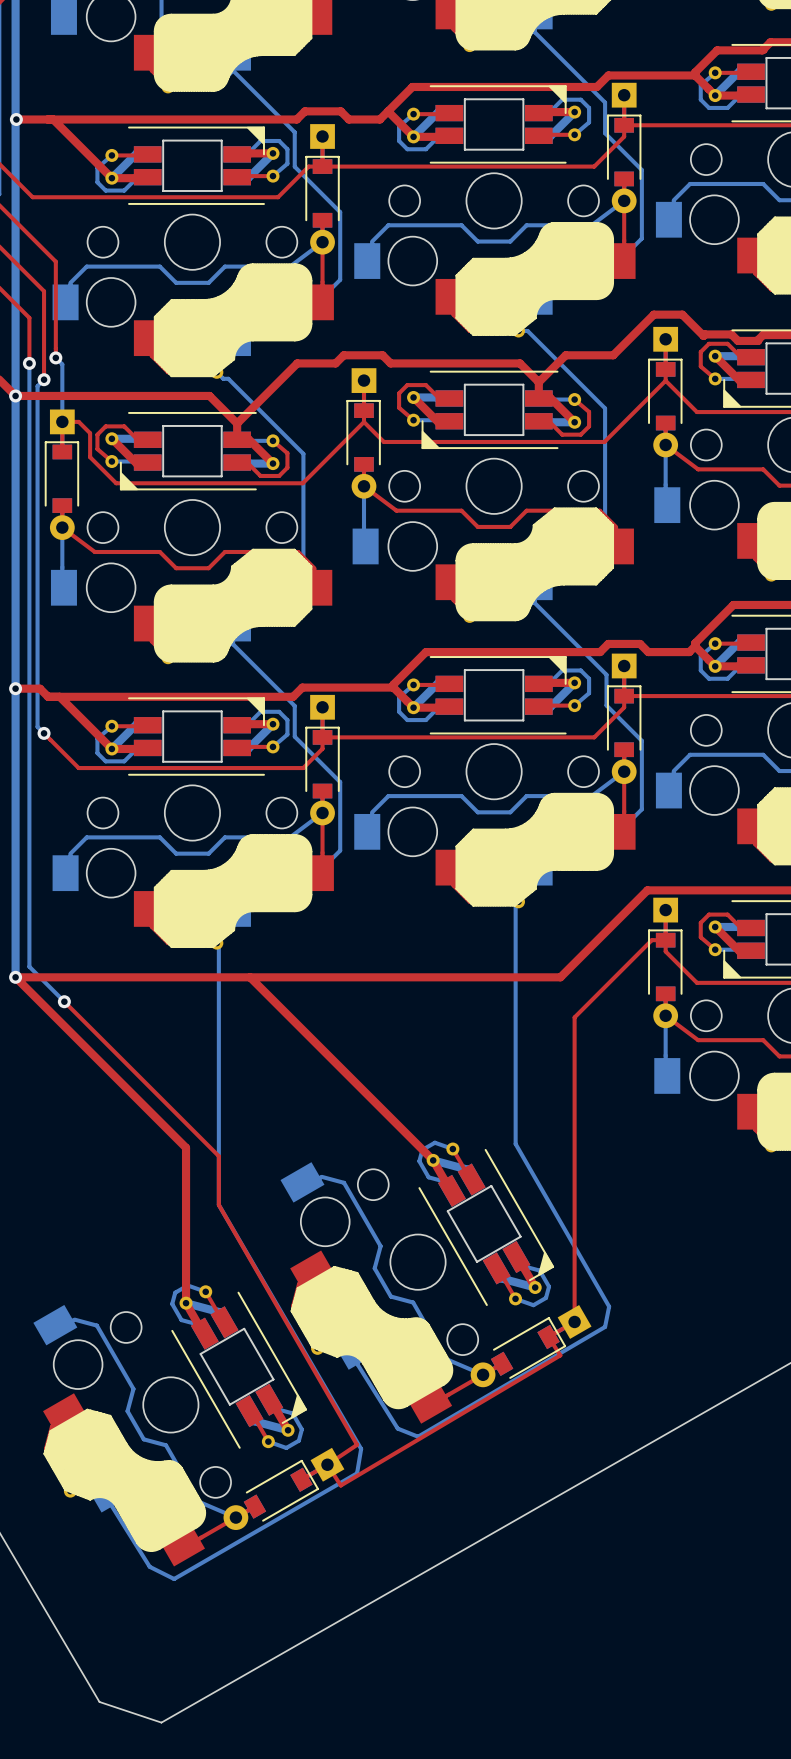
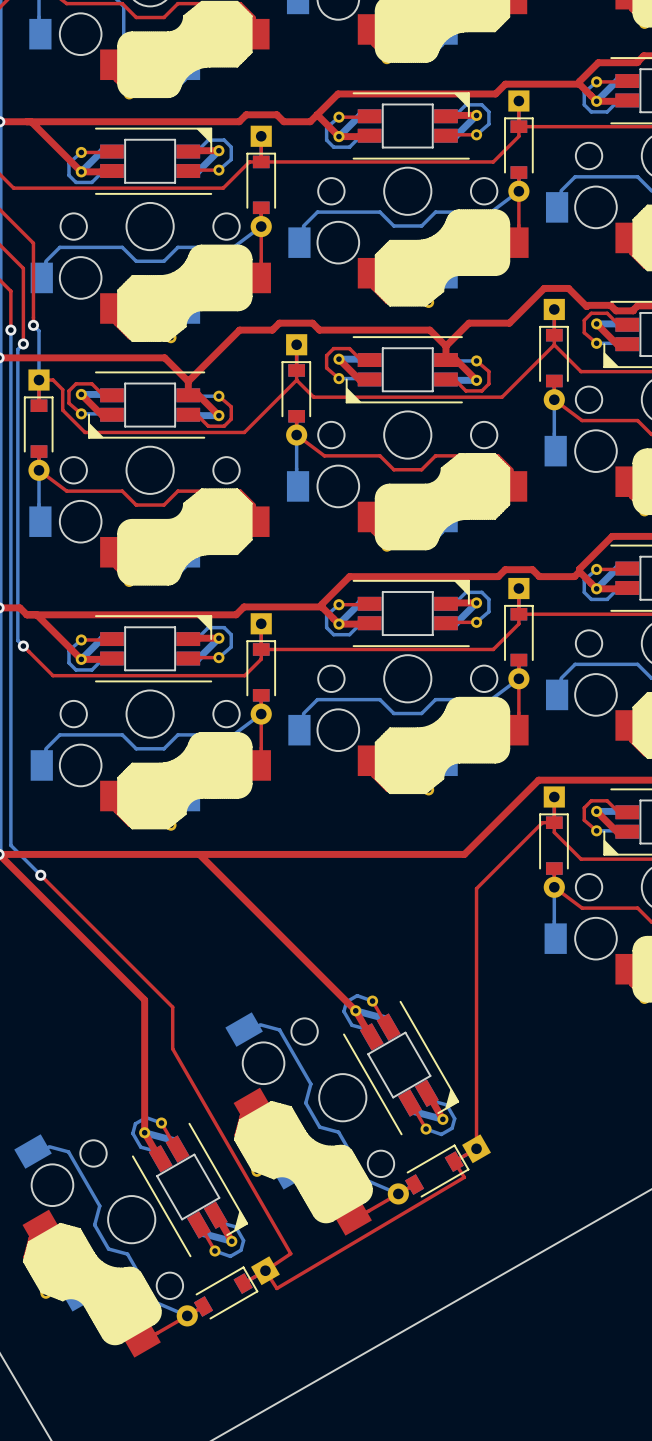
bottom track: (534, 29) (534, 32) (605, 102) (605, 133) (641, 170) (641, 238) (583, 296) (539, 296) -> none
bottom track: (233, 70) (294, 132) (294, 166) (340, 212) (340, 279) (281, 338) (237, 338) -> none
bottom track: (518, 330) (527, 330) (605, 408) (605, 560) (583, 582) (539, 582) -> none
bottom track: (216, 372) (223, 378) (228, 378) (303, 453) (303, 602) (281, 623) (237, 623) -> none
bottom track: (534, 600) (534, 603) (606, 674) (606, 705) (641, 740) (641, 809) (583, 867) (539, 867) -> none
bottom track: (233, 641) (233, 644) (294, 705) (294, 736) (340, 782) (340, 850) (281, 908) (237, 908) -> none
bottom track: (518, 901) (515, 904) (515, 1144) (609, 1306) (605, 1326) (418, 1436) (397, 1428) (357, 1364) (357, 1349) -> none
bottom track: (216, 943) (218, 945) (218, 1204) (361, 1448) (357, 1473) (174, 1579) (149, 1566) (109, 1501) (110, 1492) -> none

